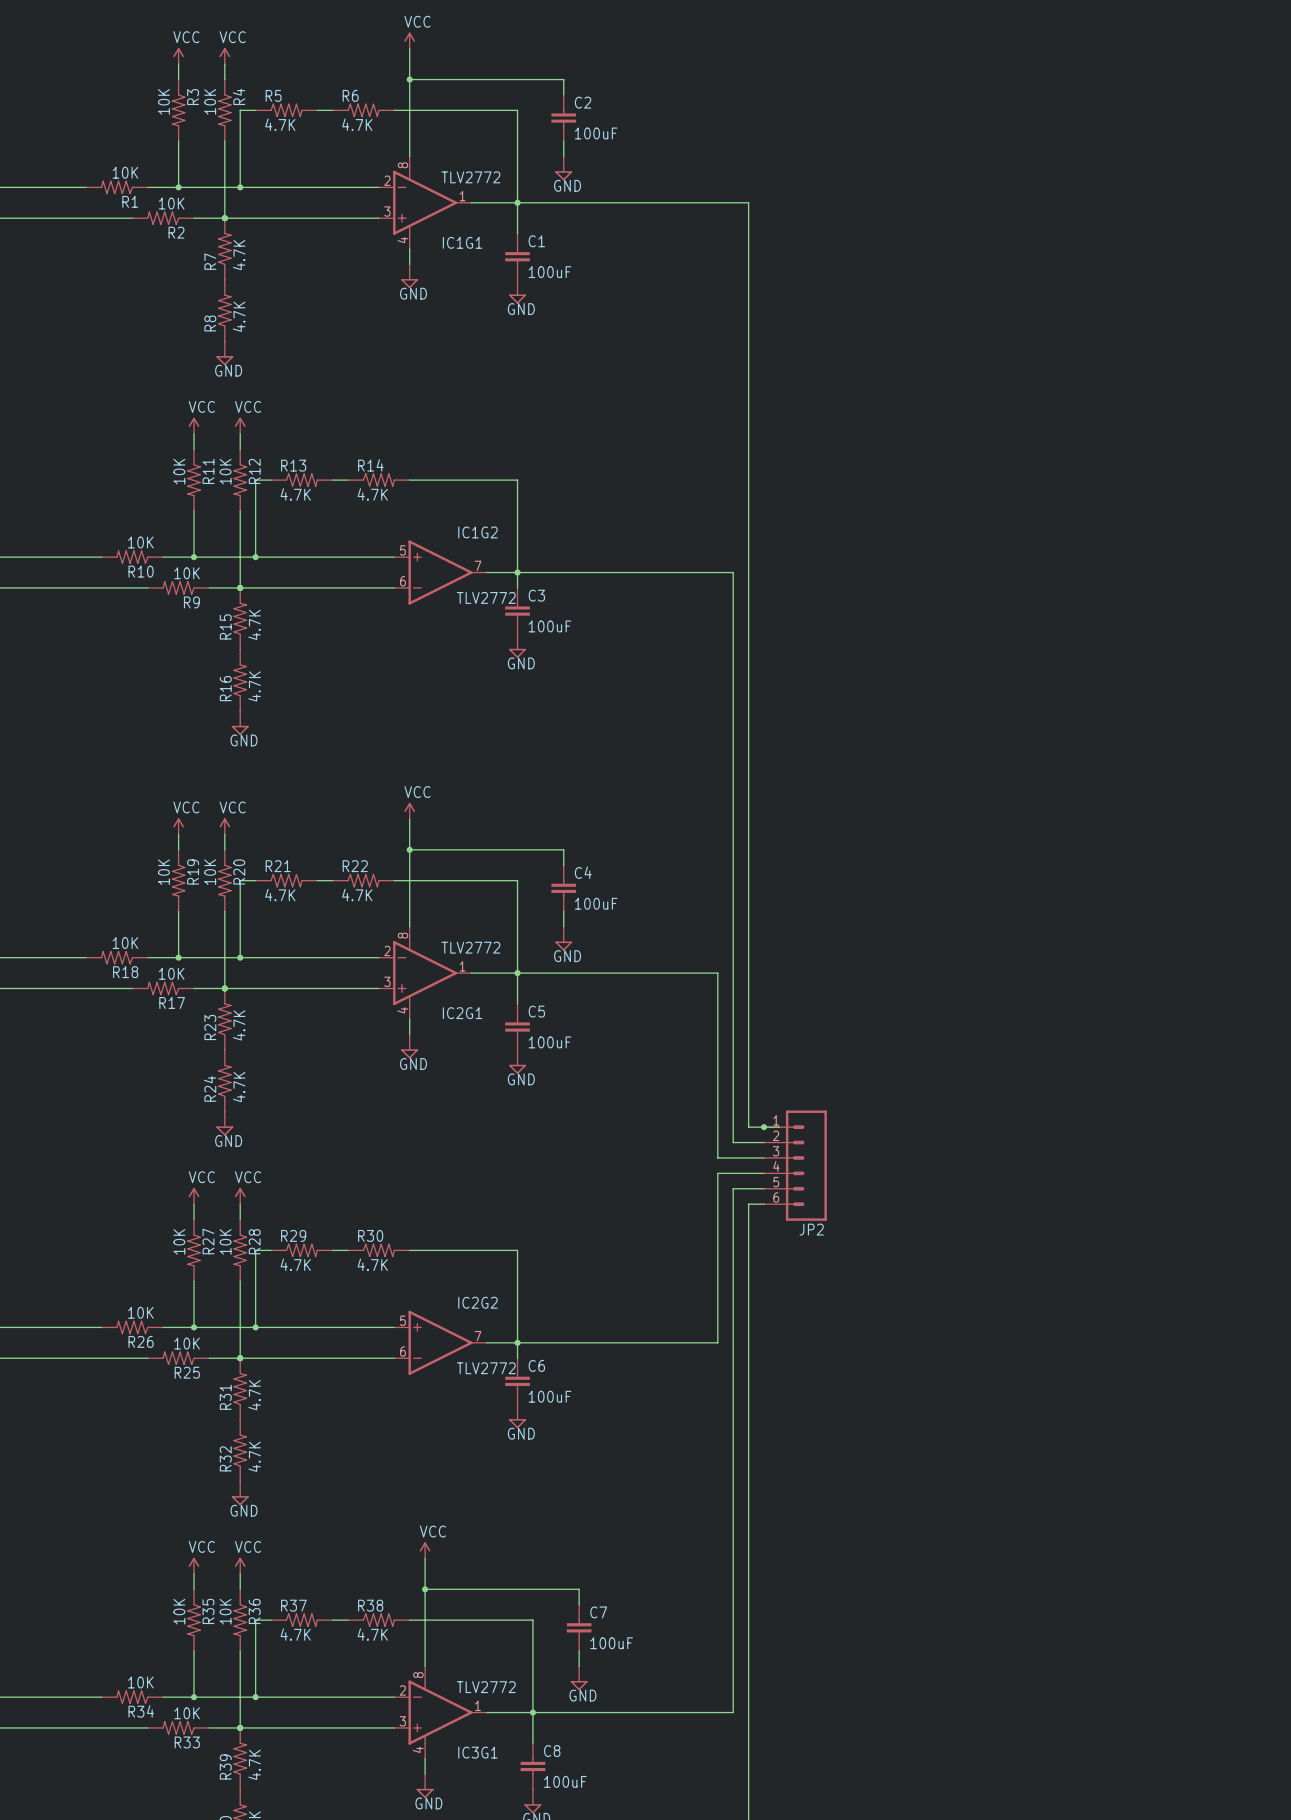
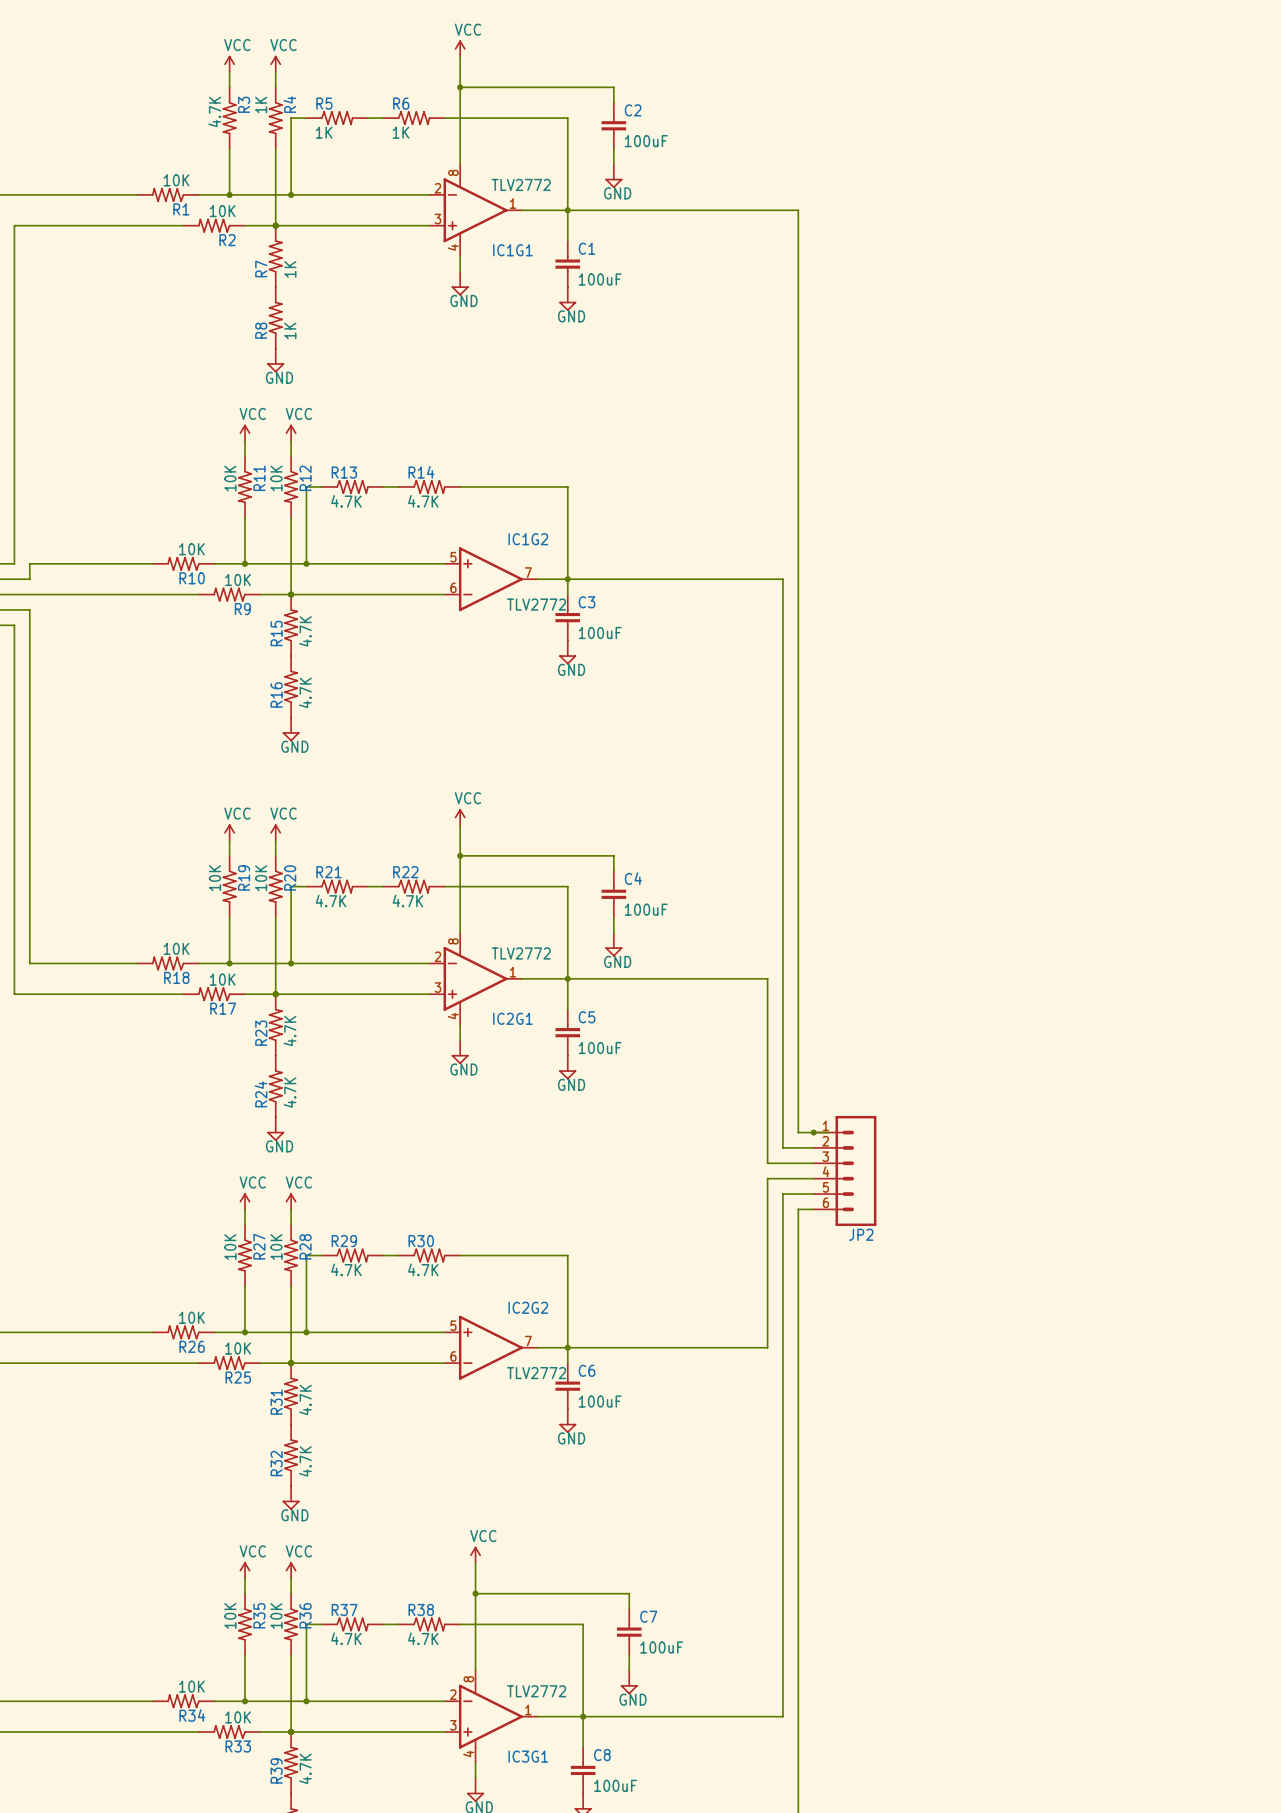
R3 value: 10K (163, 101) -> 4.7K (214, 111)
R4 value: 10K (210, 101) -> 1K (261, 105)
R5 value: 4.7K (280, 124) -> 1K (324, 132)
R6 value: 4.7K (357, 124) -> 1K (401, 132)
R7 value: 4.7K (239, 255) -> 1K (290, 269)
R8 value: 4.7K (239, 316) -> 1K (290, 330)

